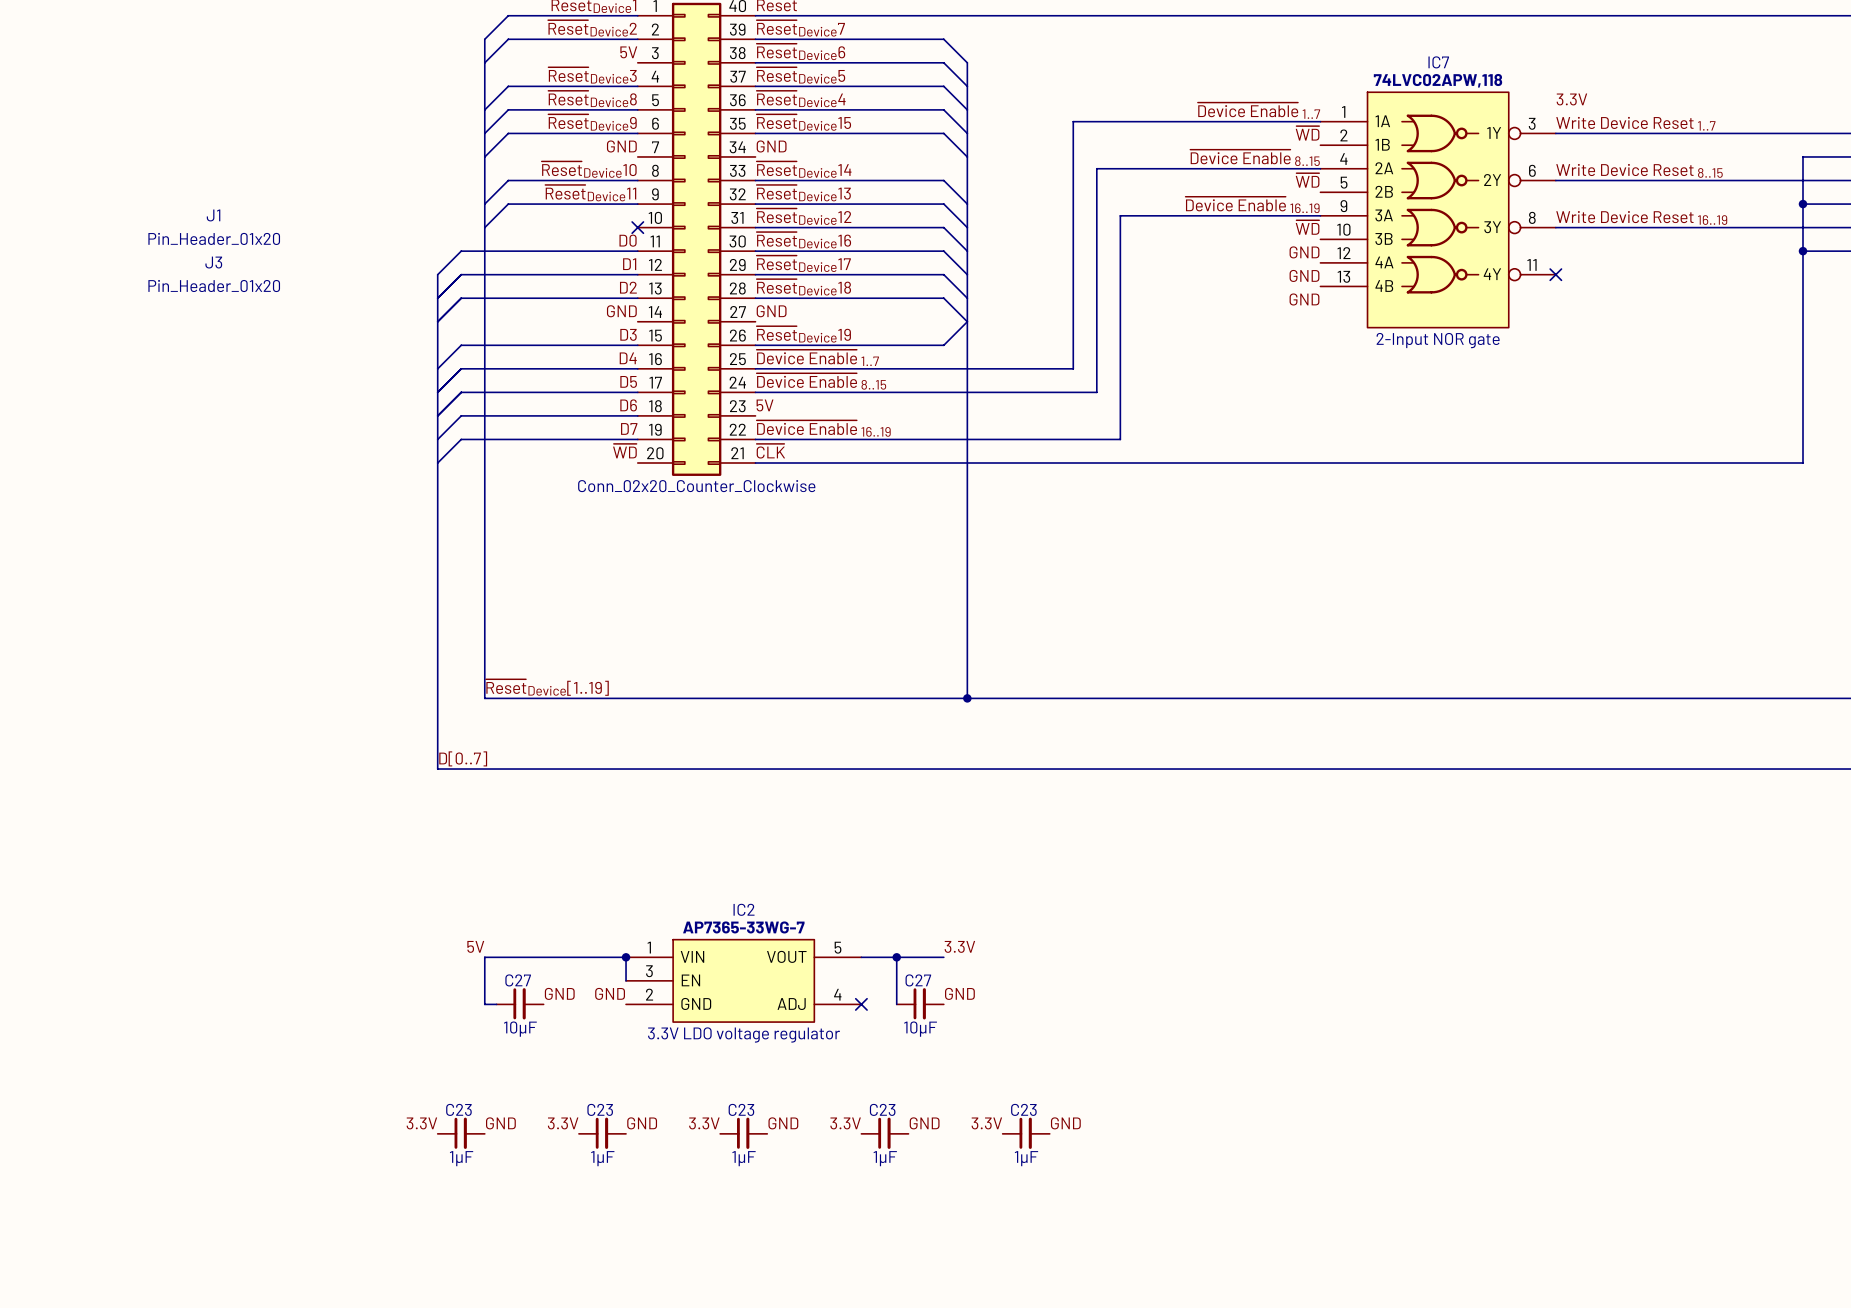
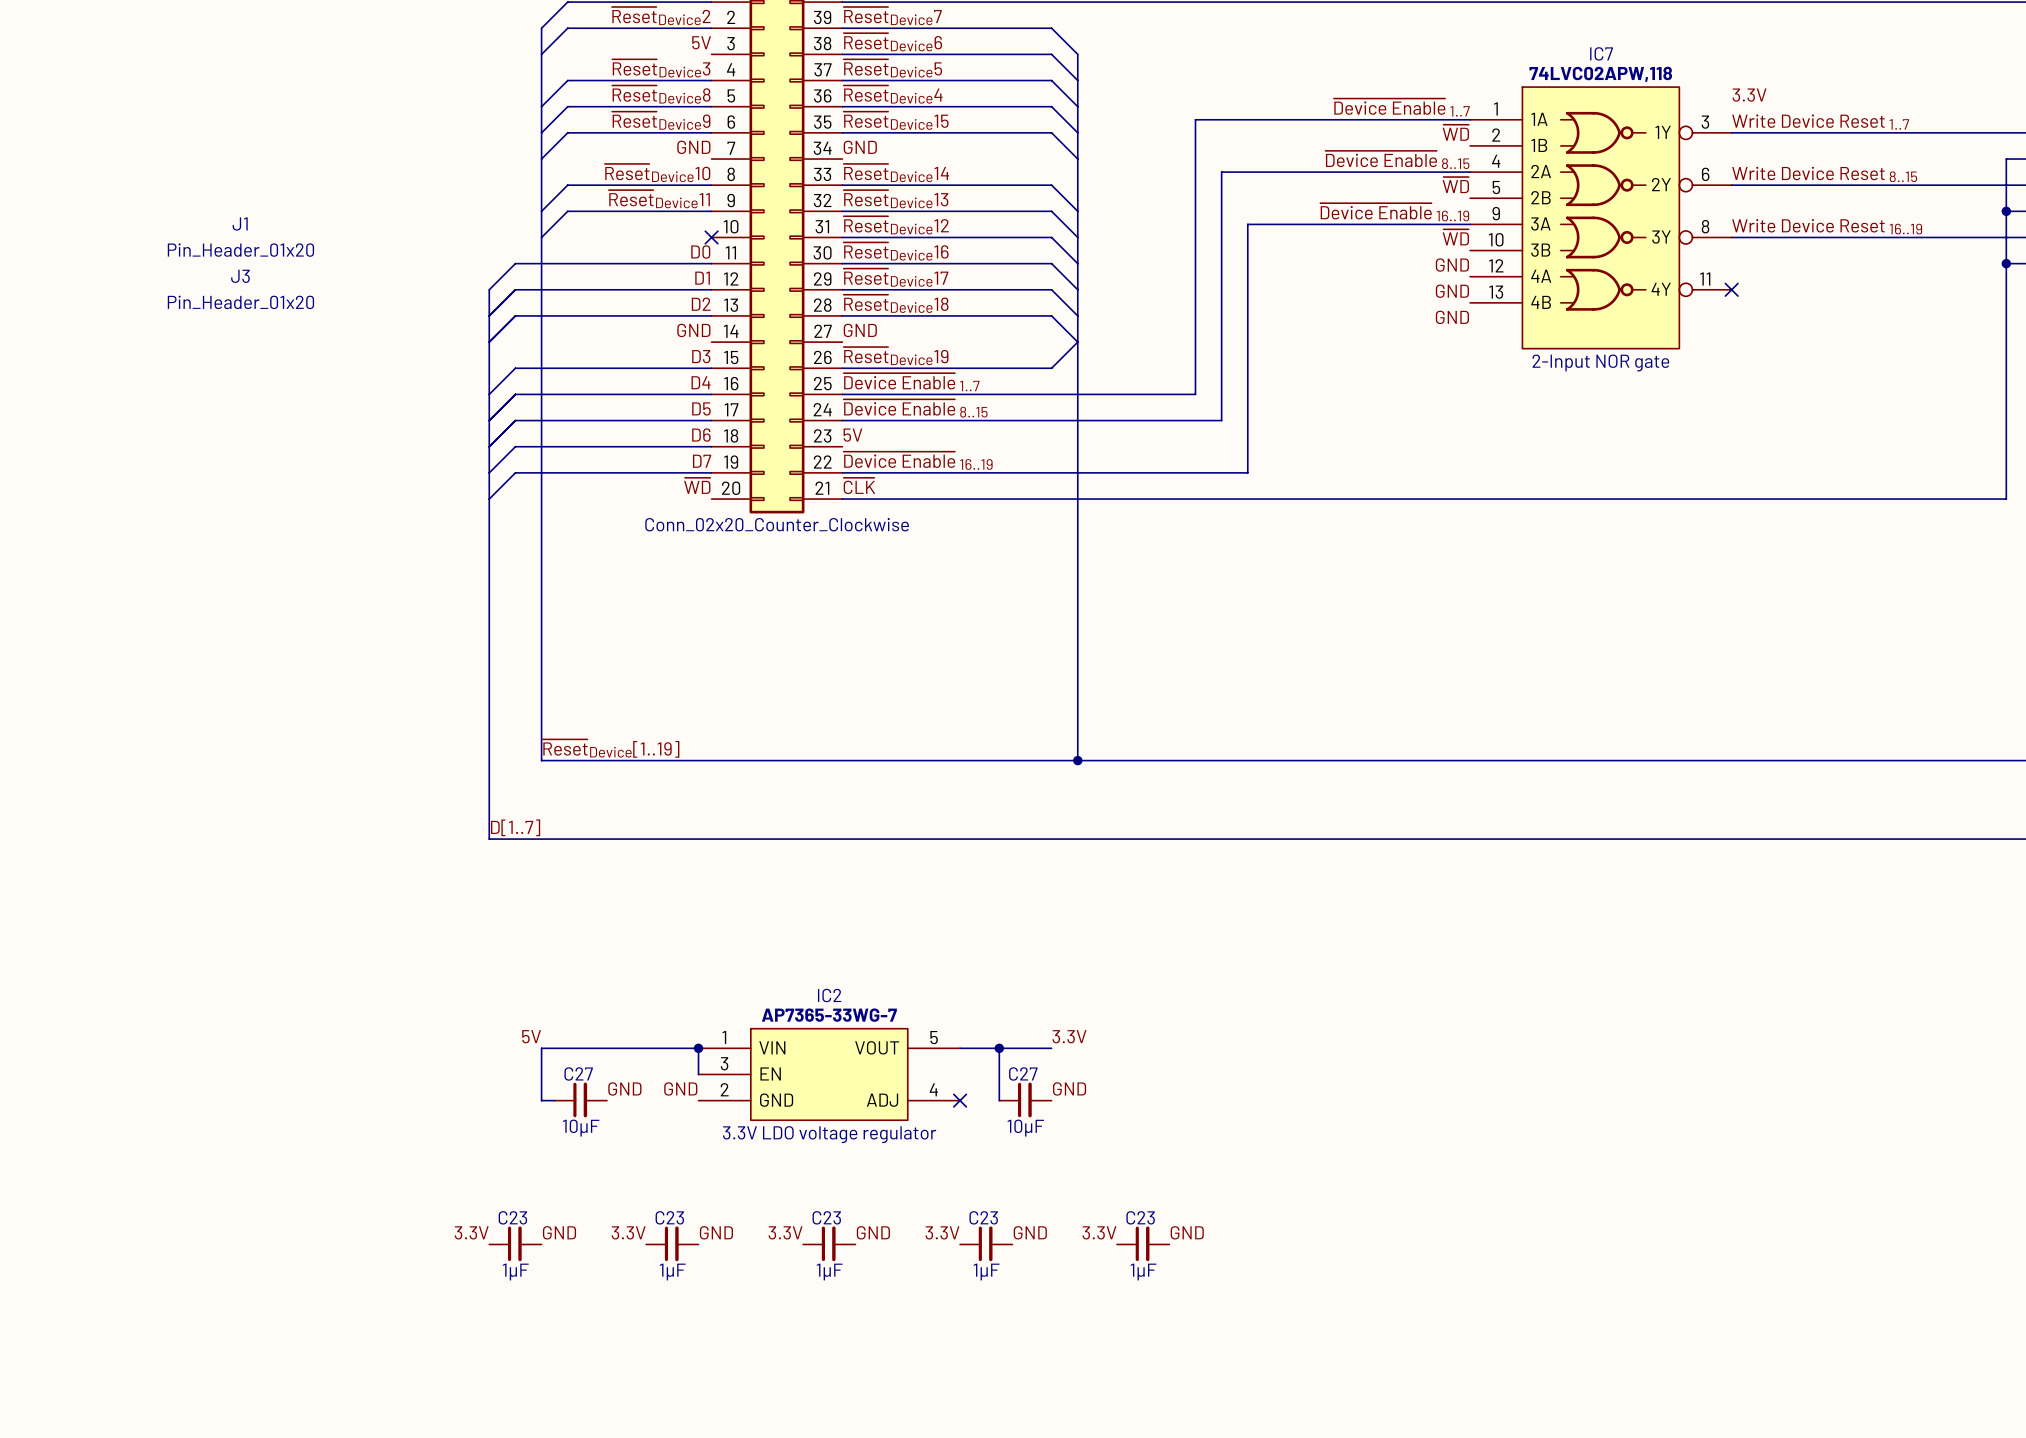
label: D[0..7] (463, 758) -> D[1..7] (515, 827)

